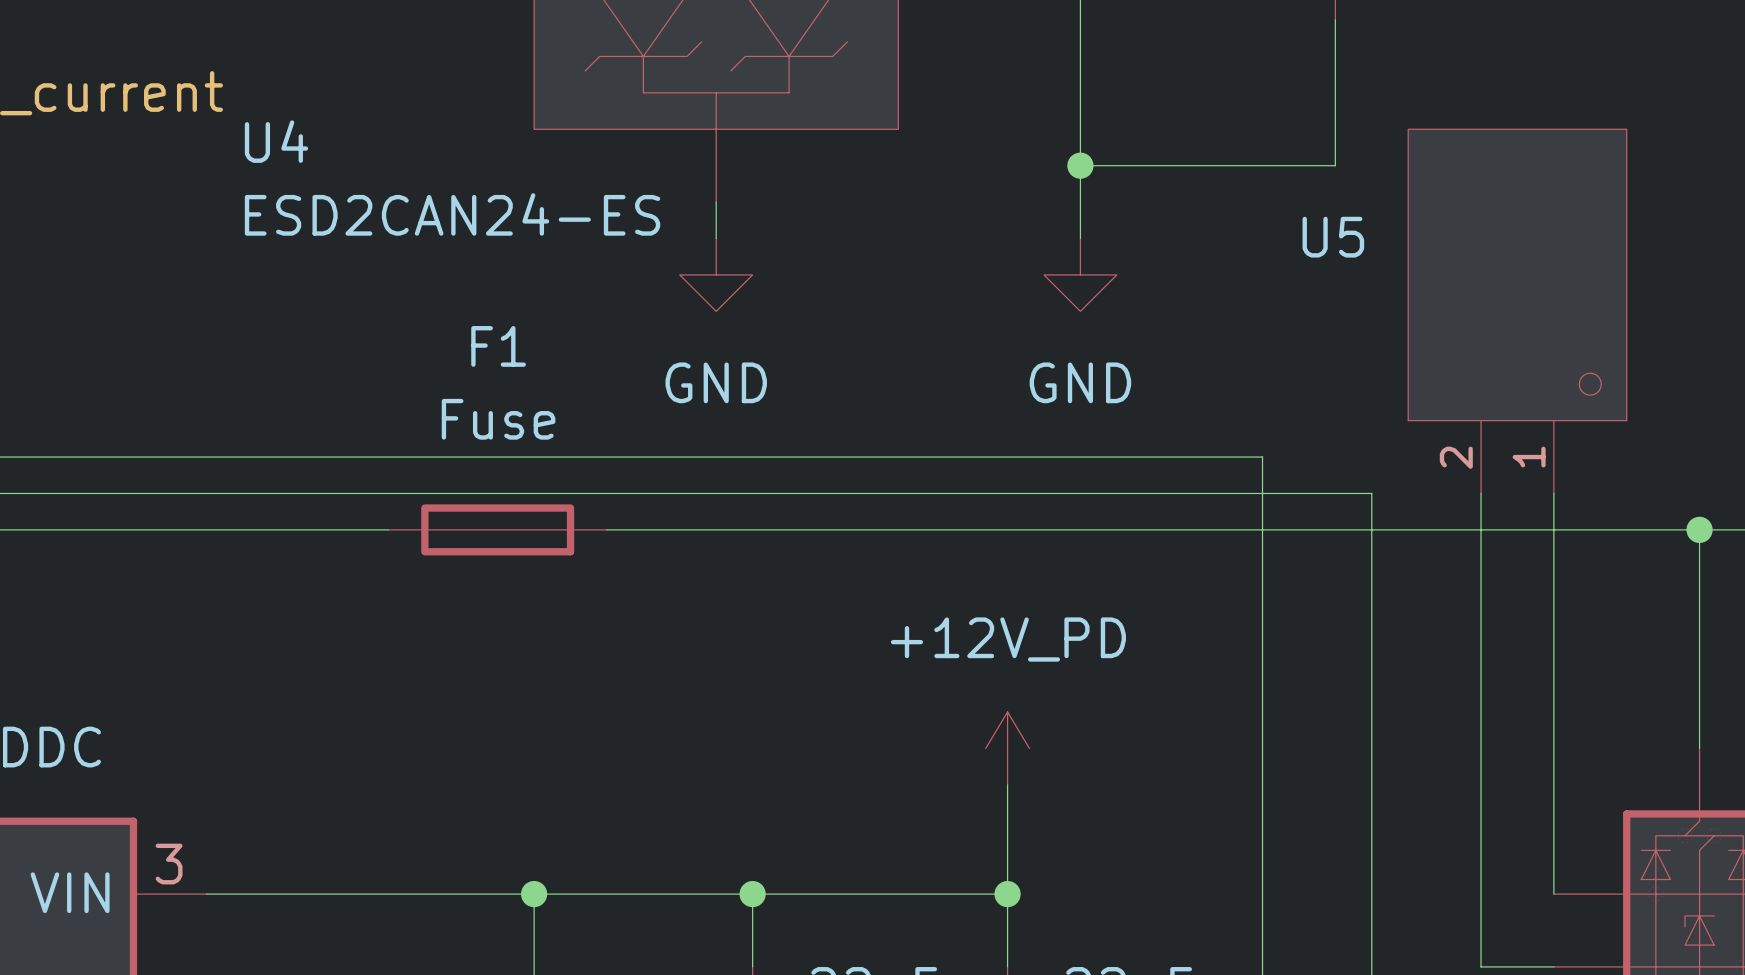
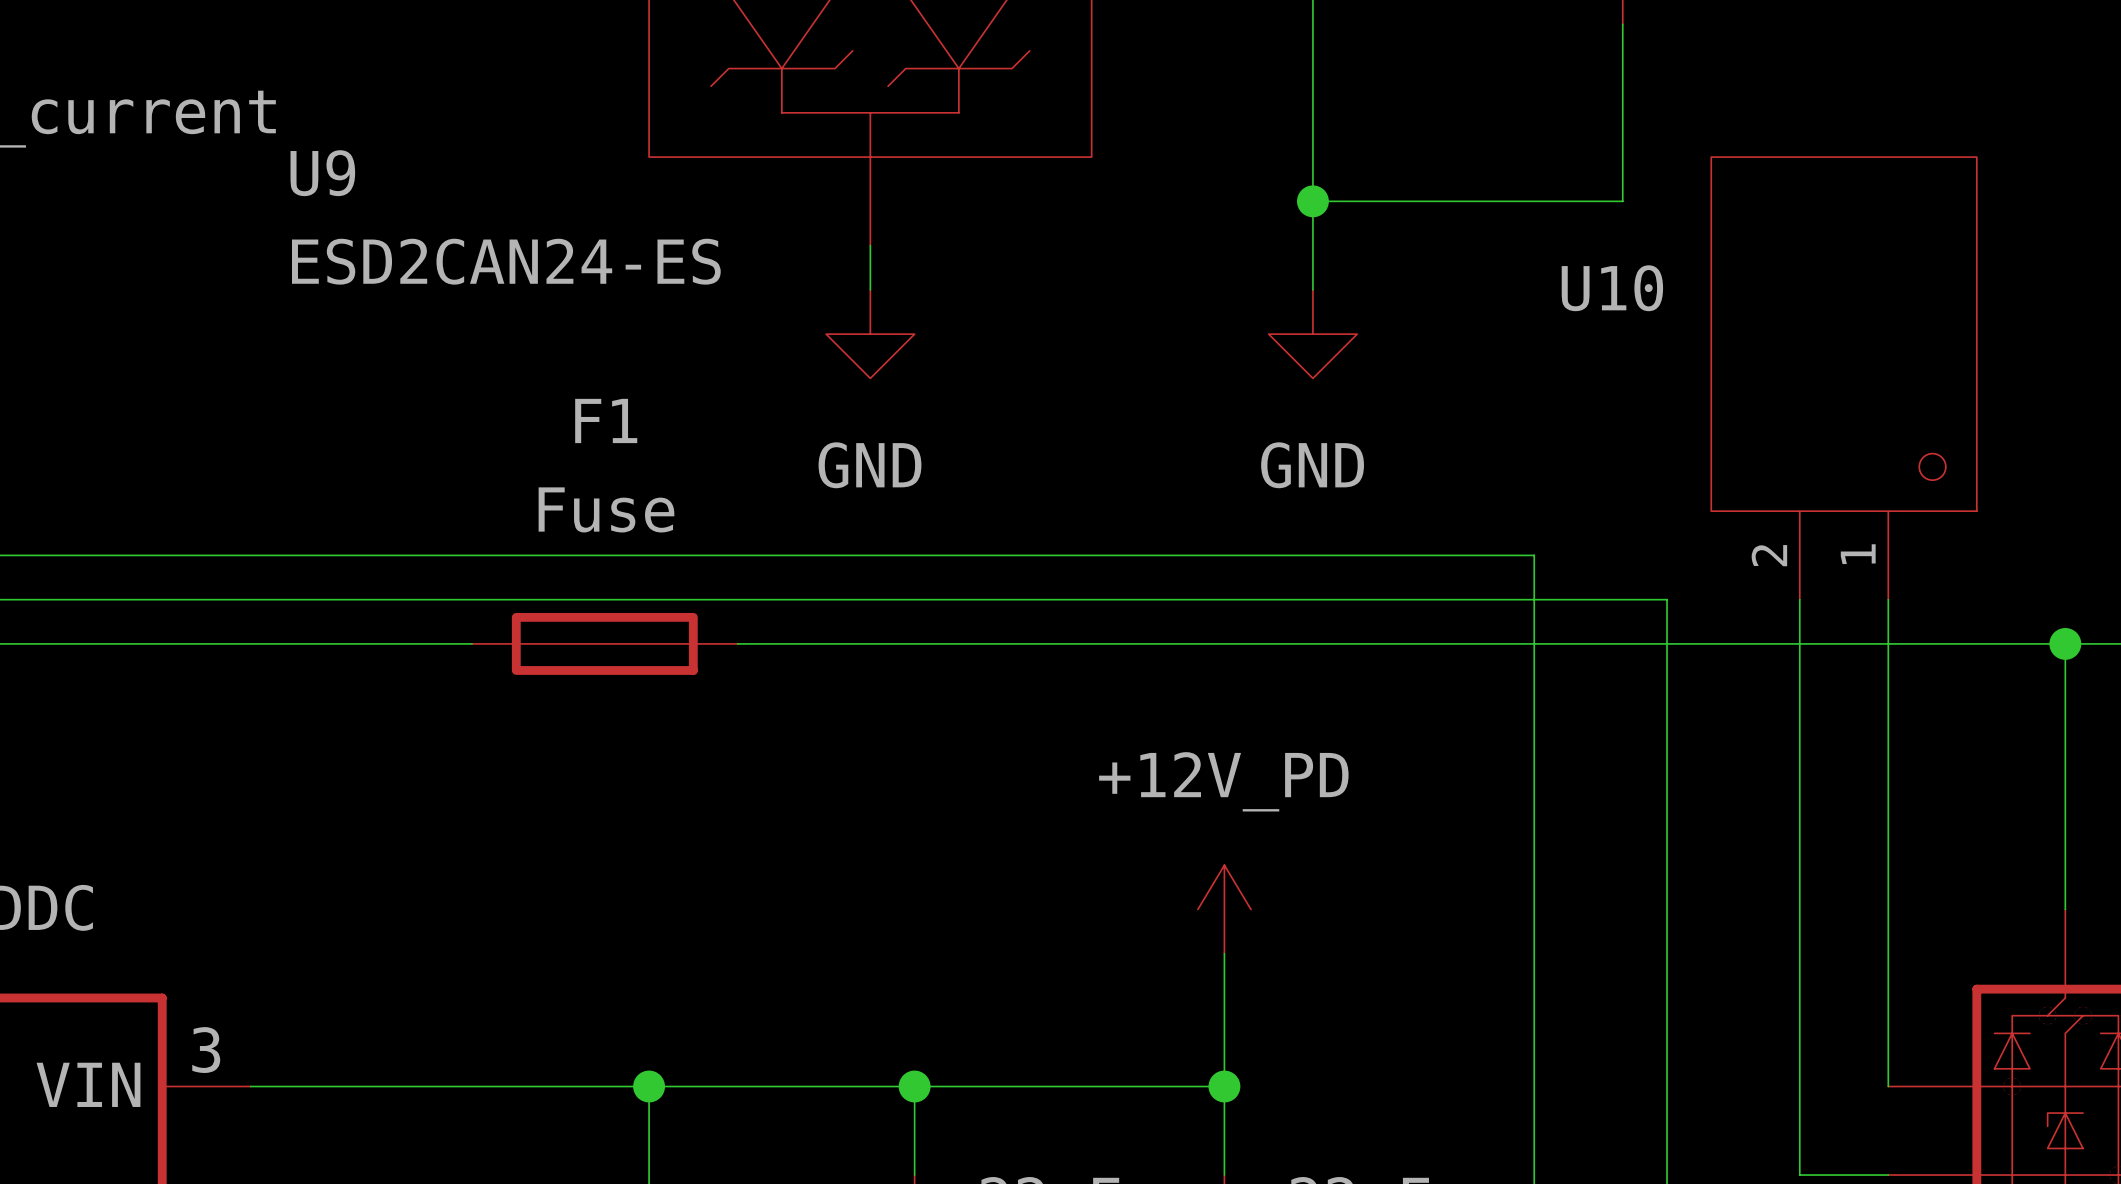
U4 name: U4 (276, 141) -> U9 (322, 173)
U5 name: U5 (1333, 237) -> U10 (1612, 288)

